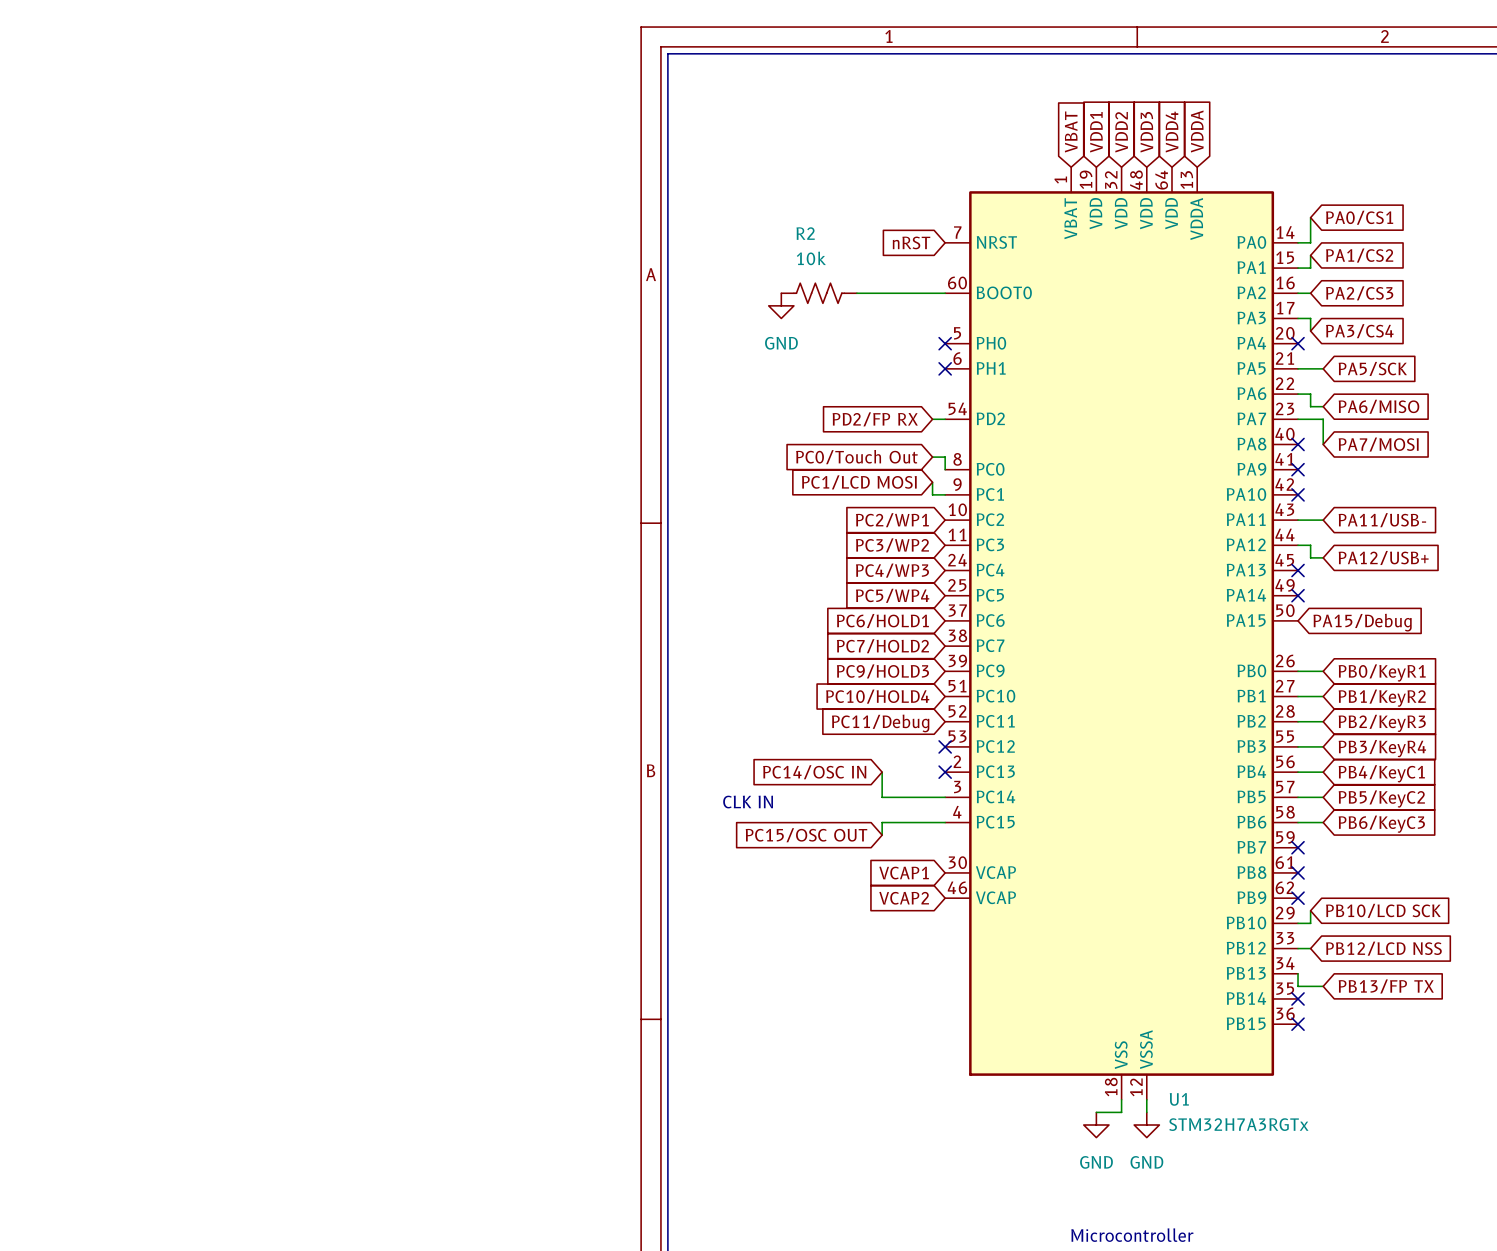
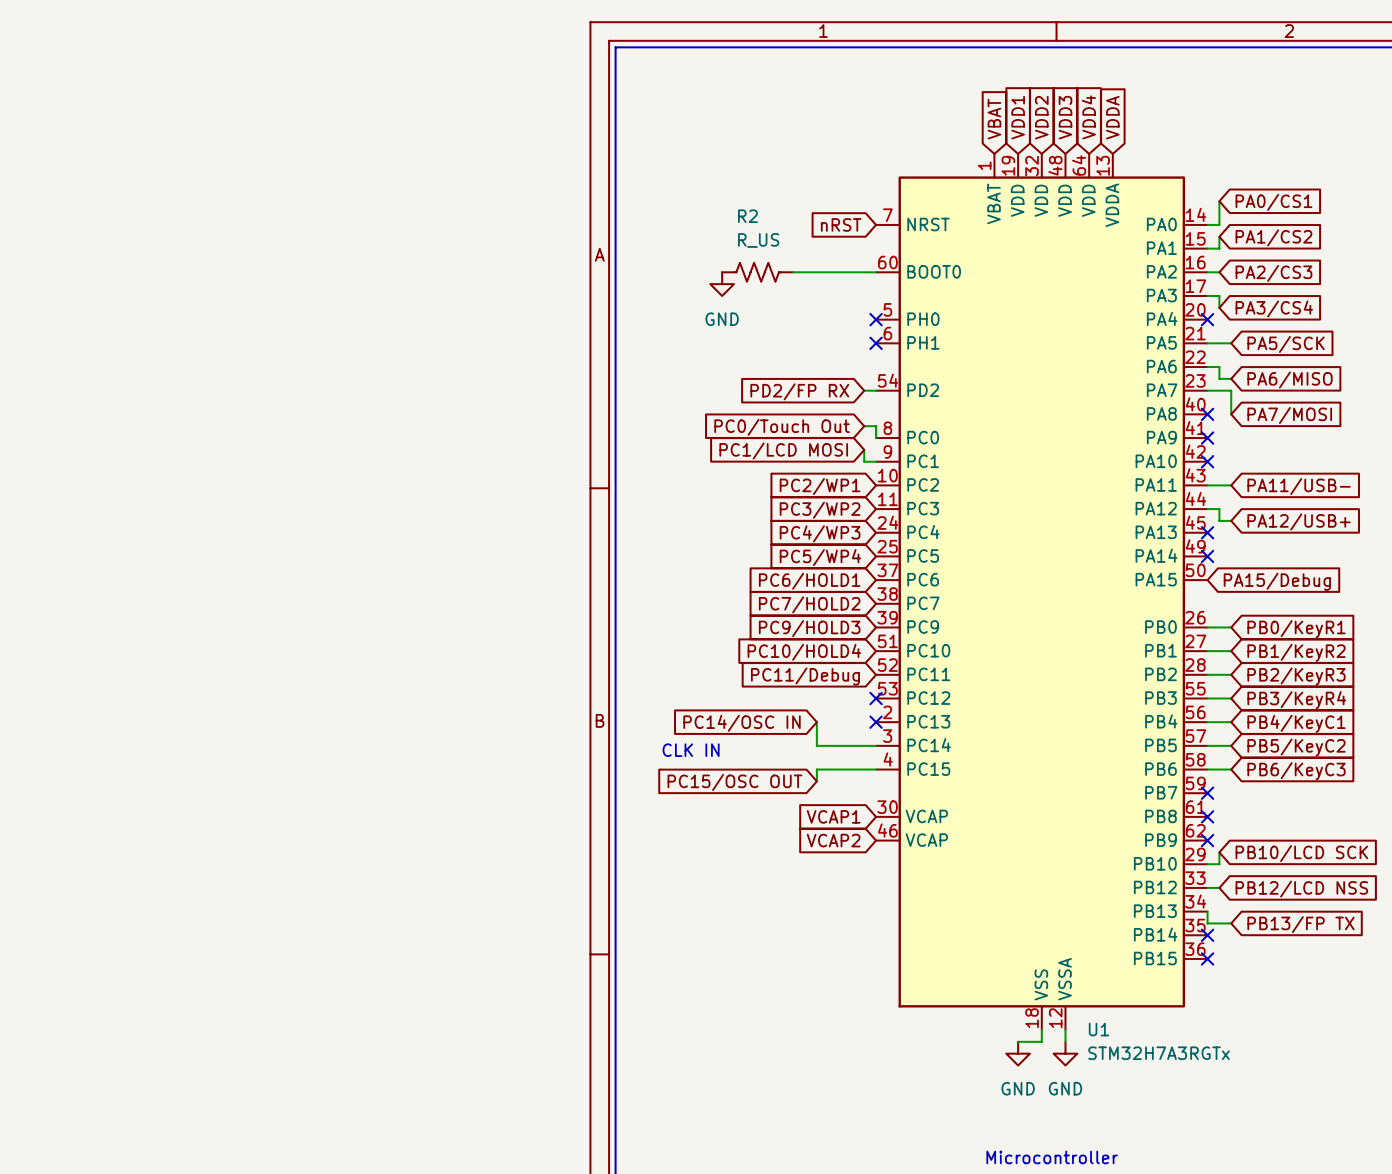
R2 value: 10k (811, 258) -> R_US (758, 240)

